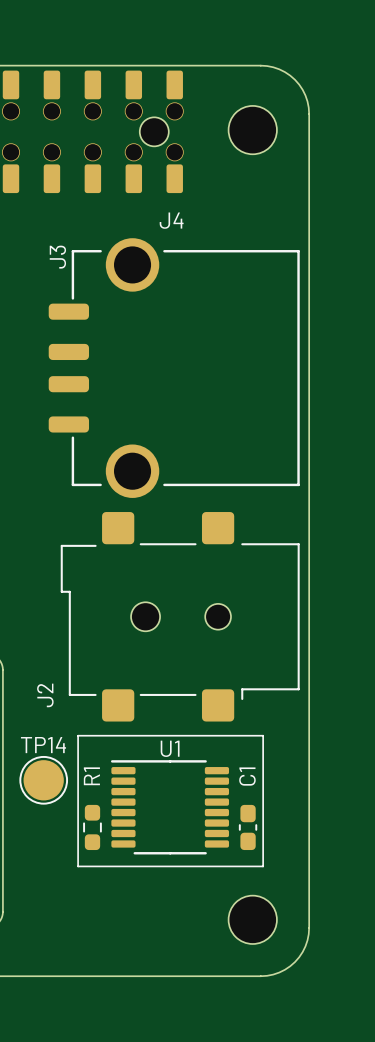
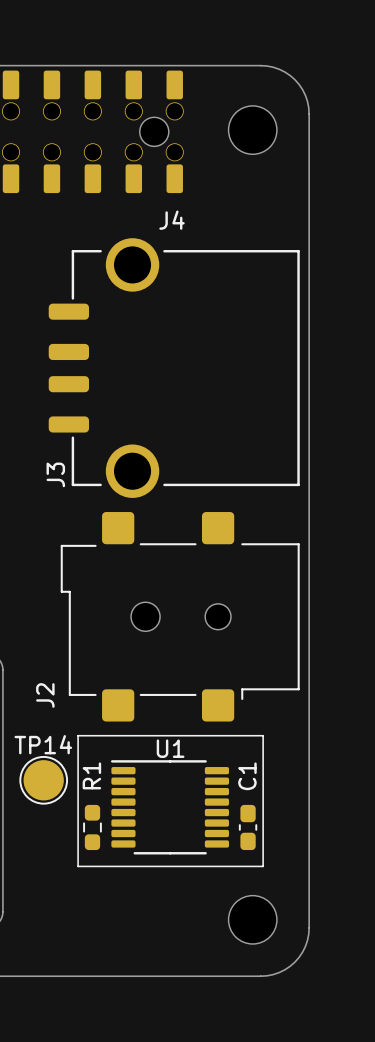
J3 name position: J3 (57, 257) -> J3 (55, 474)

